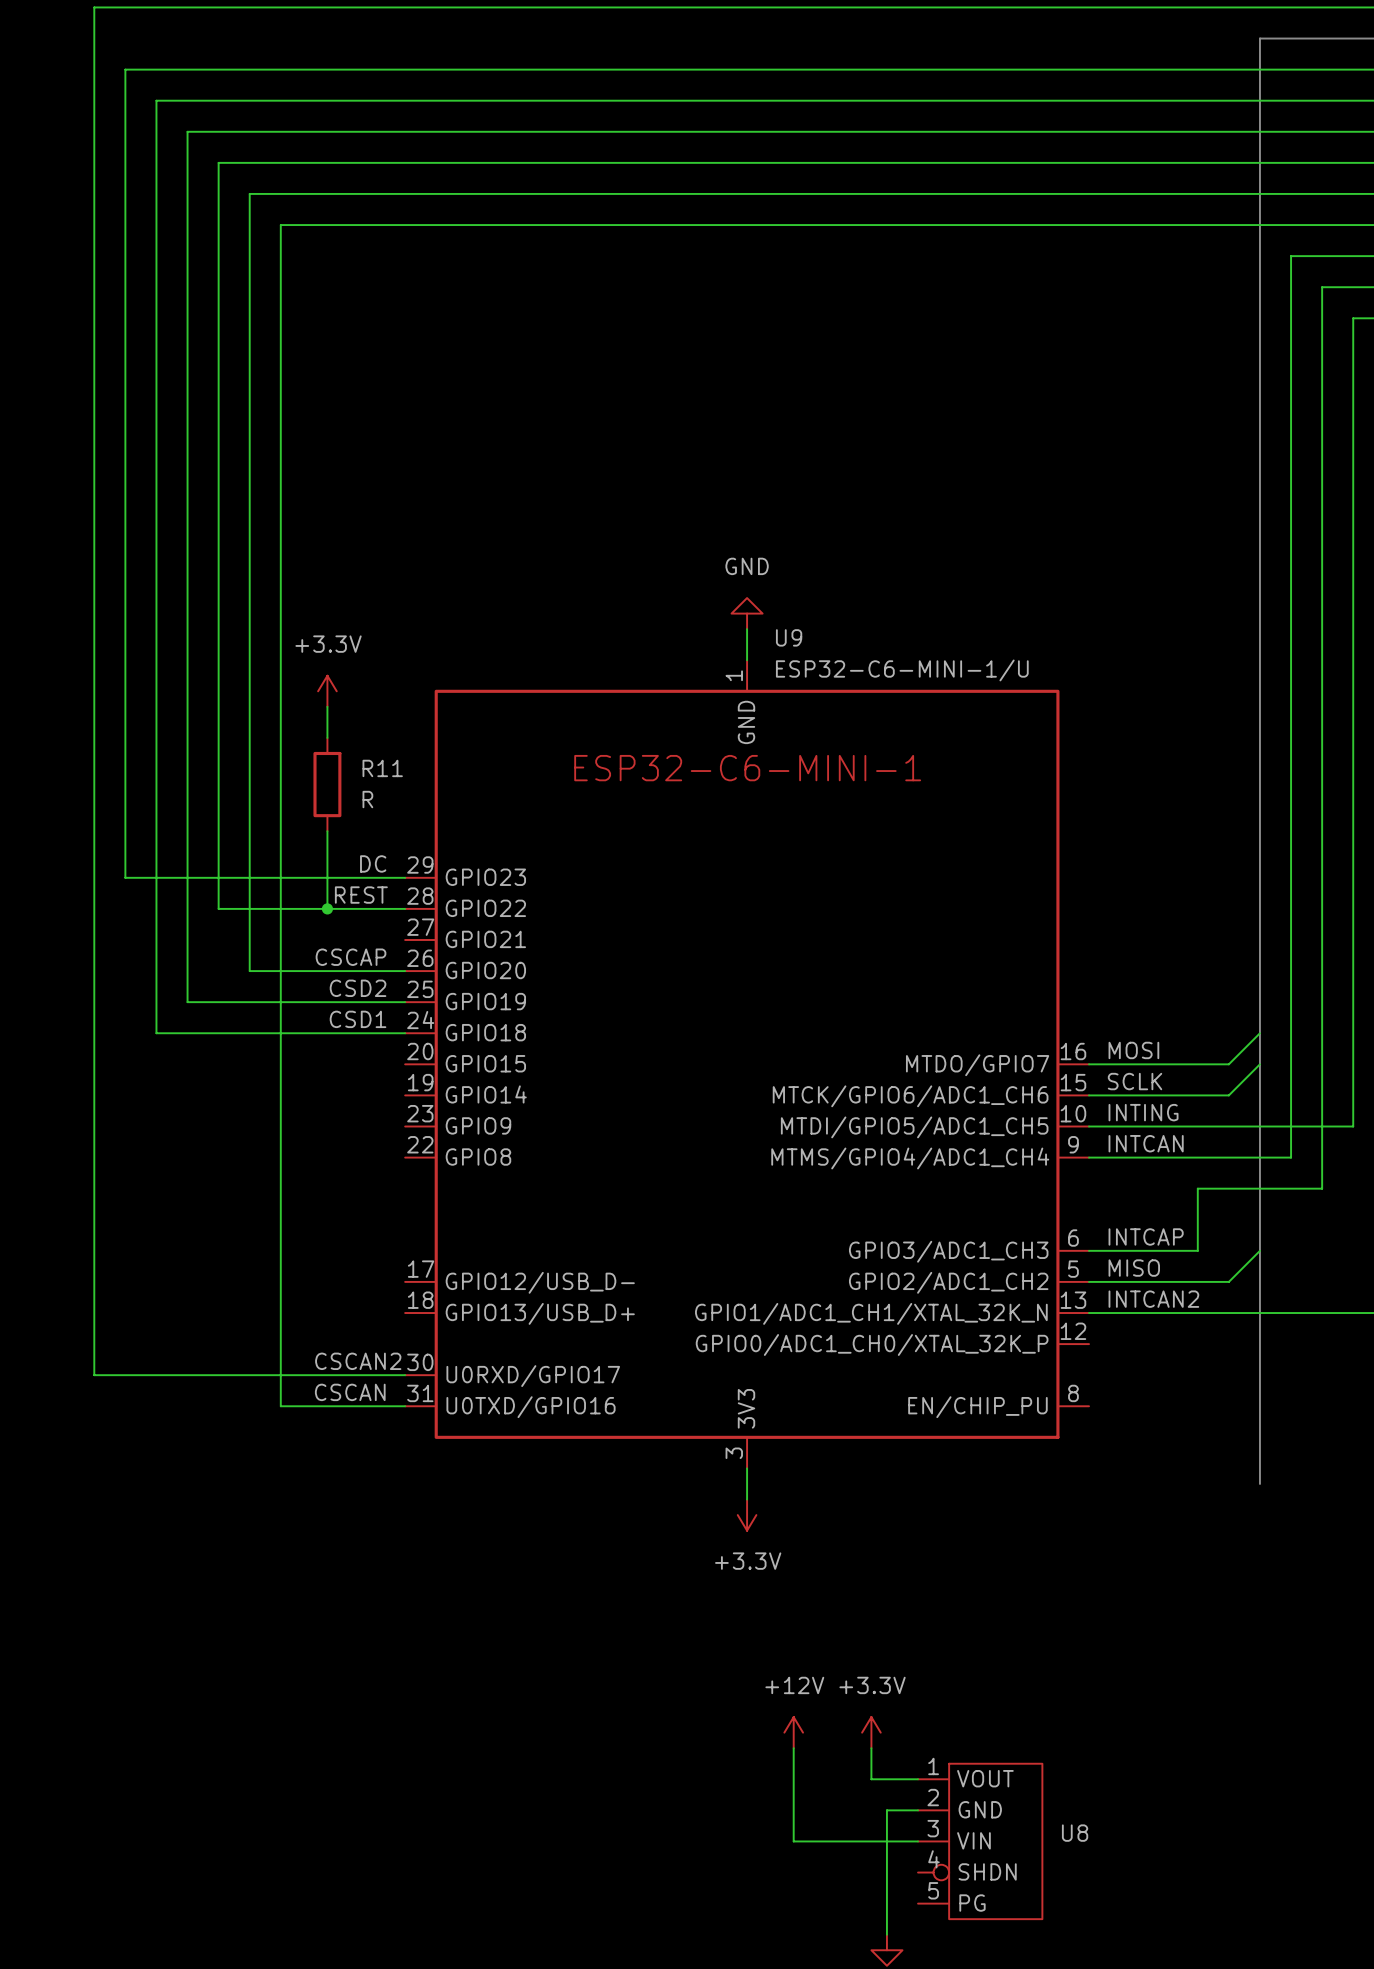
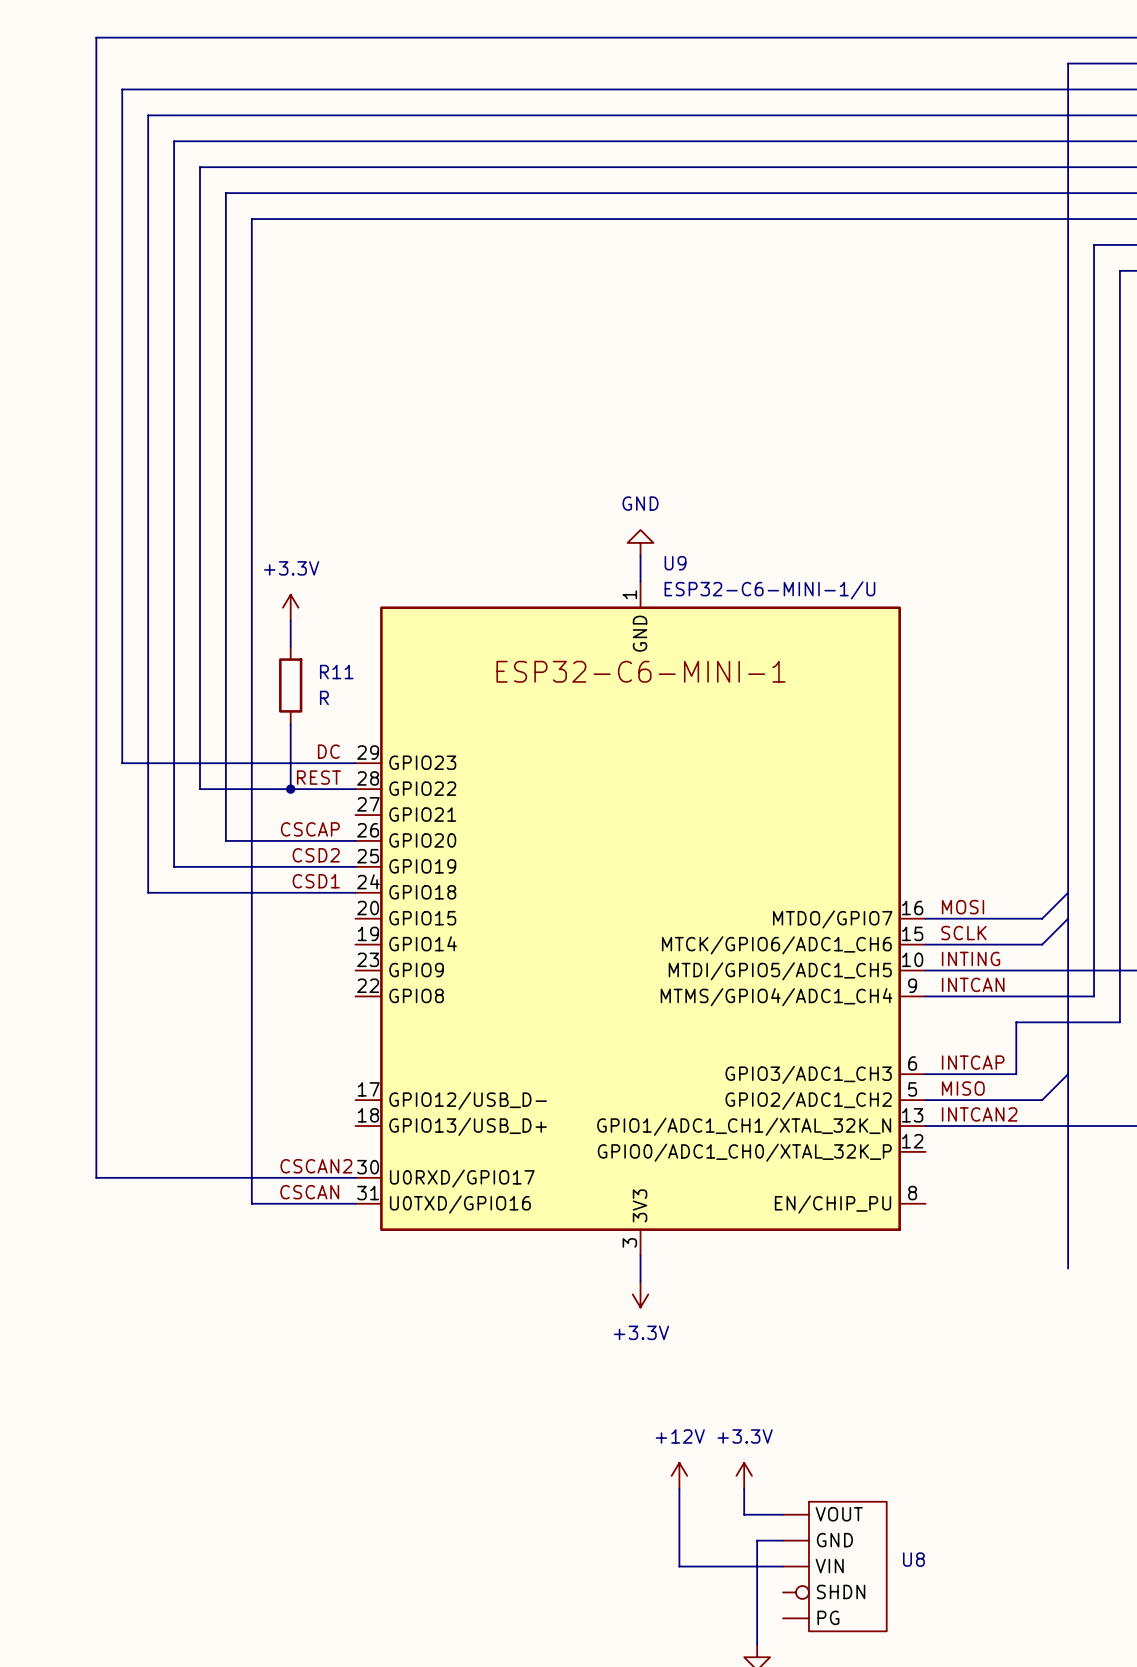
U8 pin number: 1 (933, 1766) -> none
U8 pin number: 2 (933, 1797) -> none
U8 pin number: 3 (933, 1828) -> none
U8 pin number: 4 (933, 1859) -> none
U8 pin number: 5 (933, 1890) -> none

